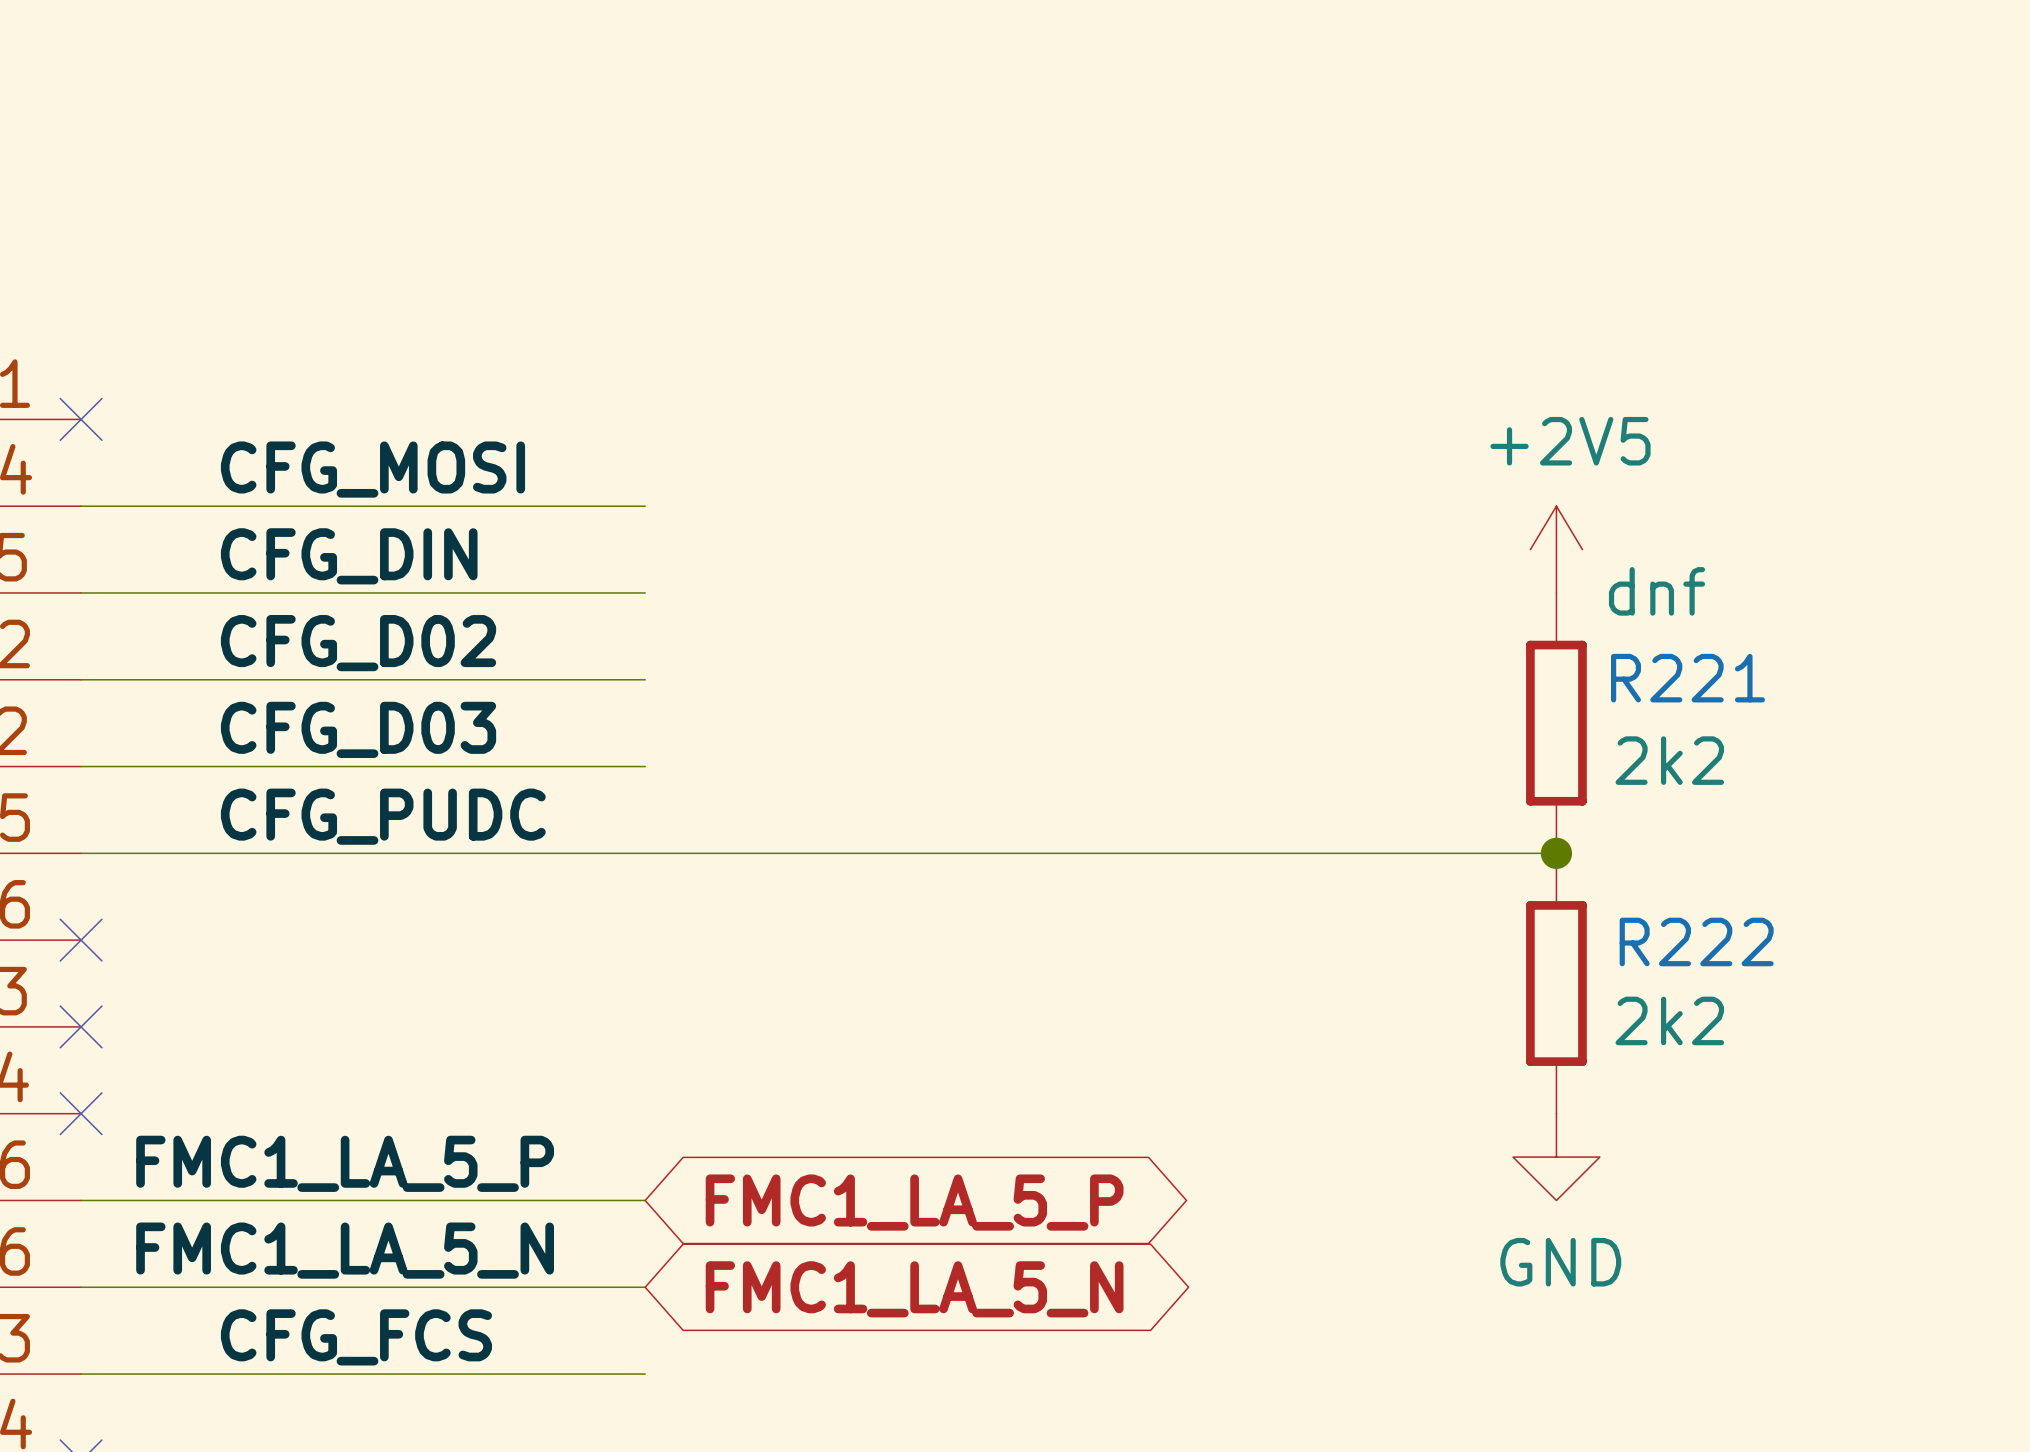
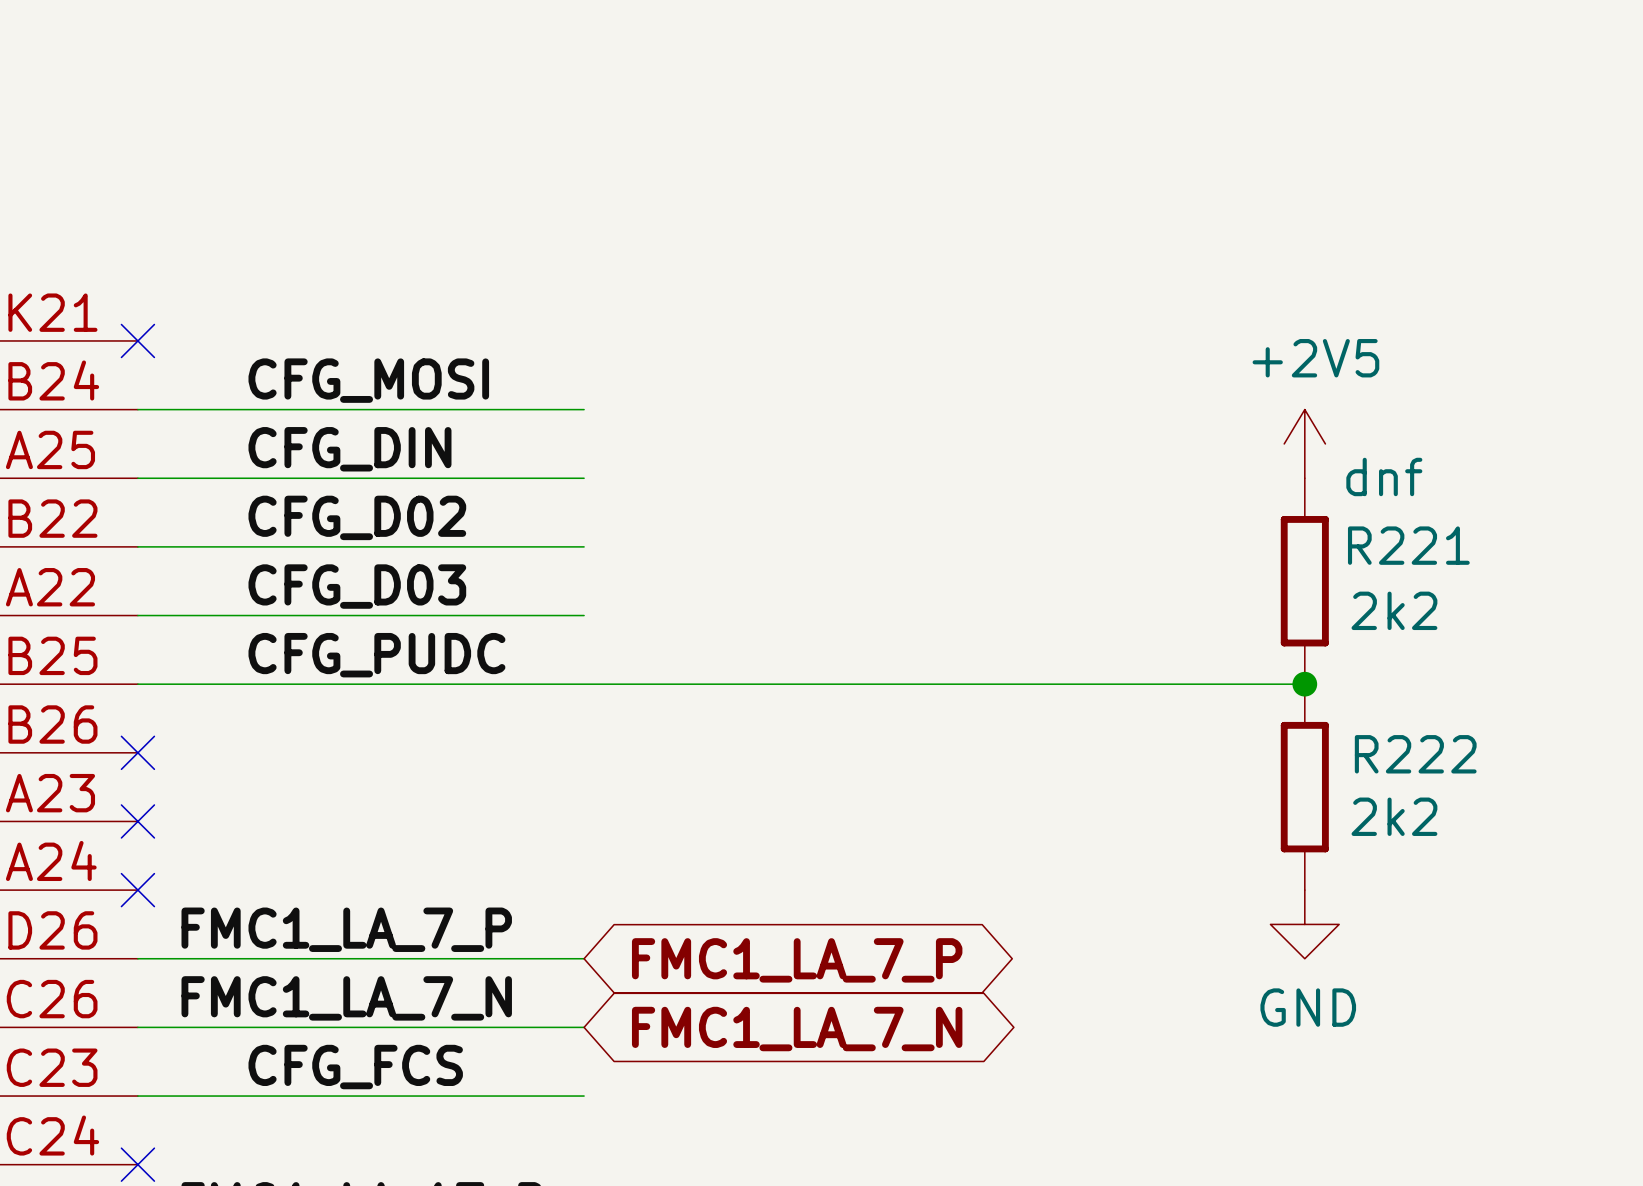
label: FMC1_LA_5_P (345, 1163) -> FMC1_LA_7_P (346, 929)
global label: FMC1_LA_5_P (914, 1202) -> FMC1_LA_7_P (797, 960)
label: FMC1_LA_5_N (345, 1250) -> FMC1_LA_7_N (346, 998)
global label: FMC1_LA_5_N (914, 1289) -> FMC1_LA_7_N (797, 1029)

